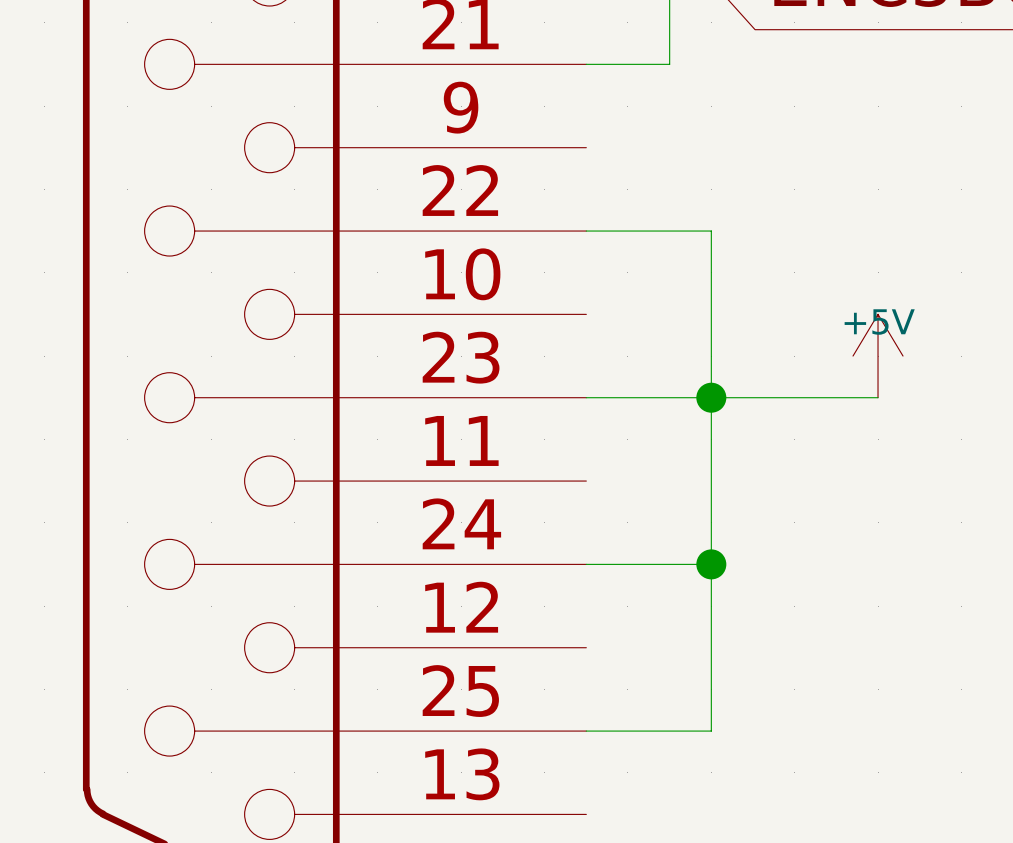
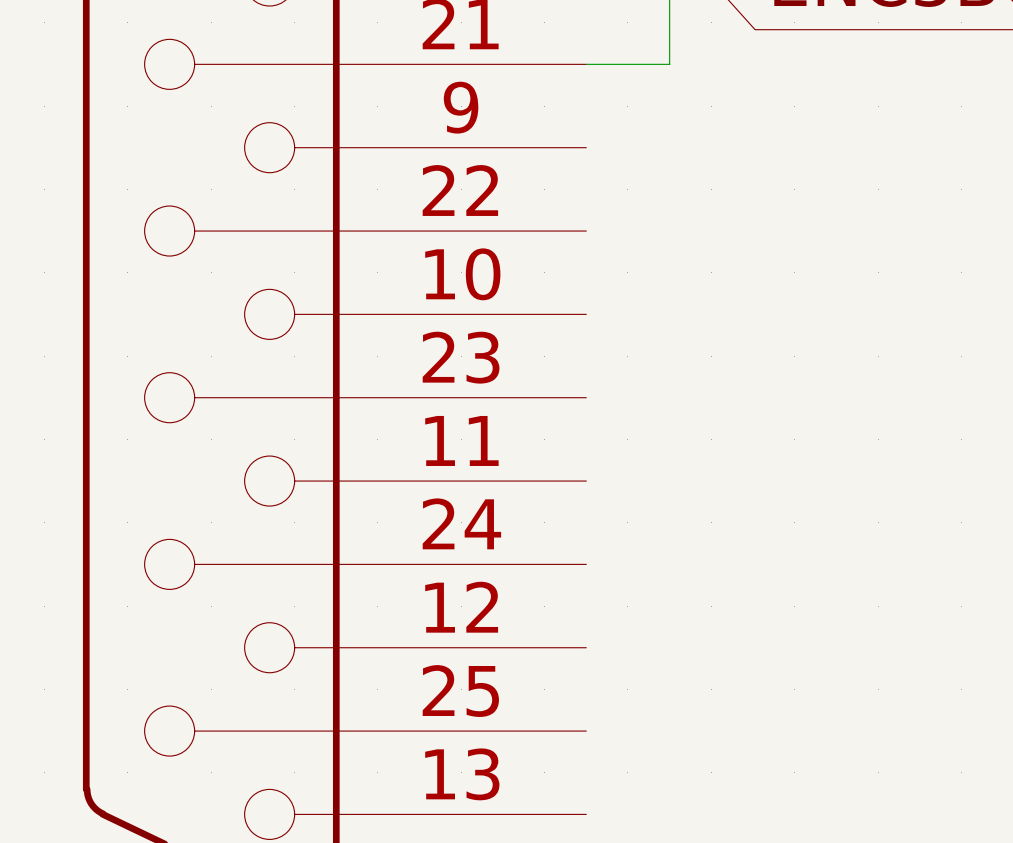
wire: (586, 231) (711, 231) (711, 731) (586, 731) -> none
power symbol: +5V (878, 356) -> none
wire: (586, 397) (878, 397) -> none
junction: (711, 397) -> none
wire: (586, 564) (711, 564) -> none
junction: (711, 564) -> none

